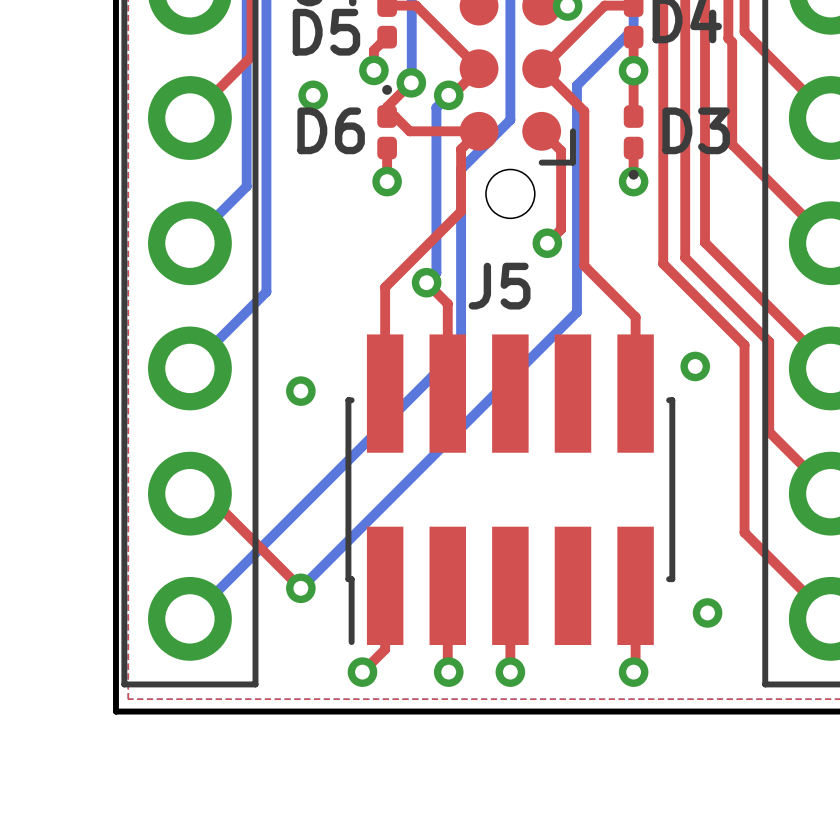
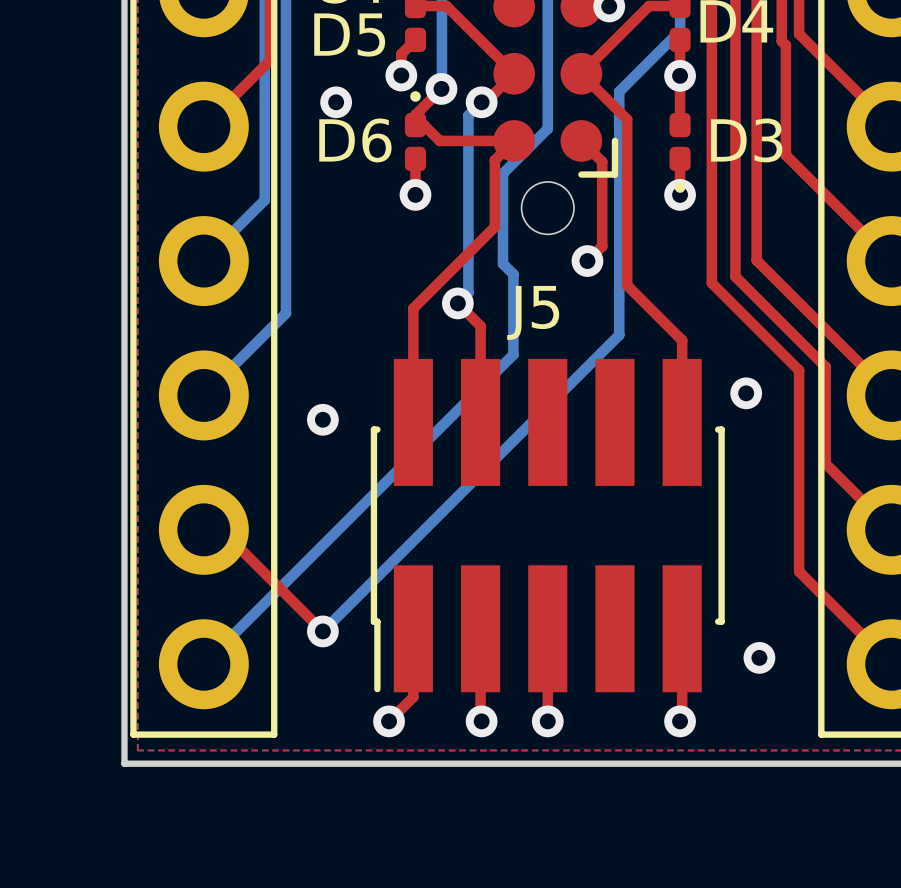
bottom track: (468, 161) (461, 169) (461, 347) -> (503, 173) (503, 263) (513, 274) (513, 354) (494, 373)

